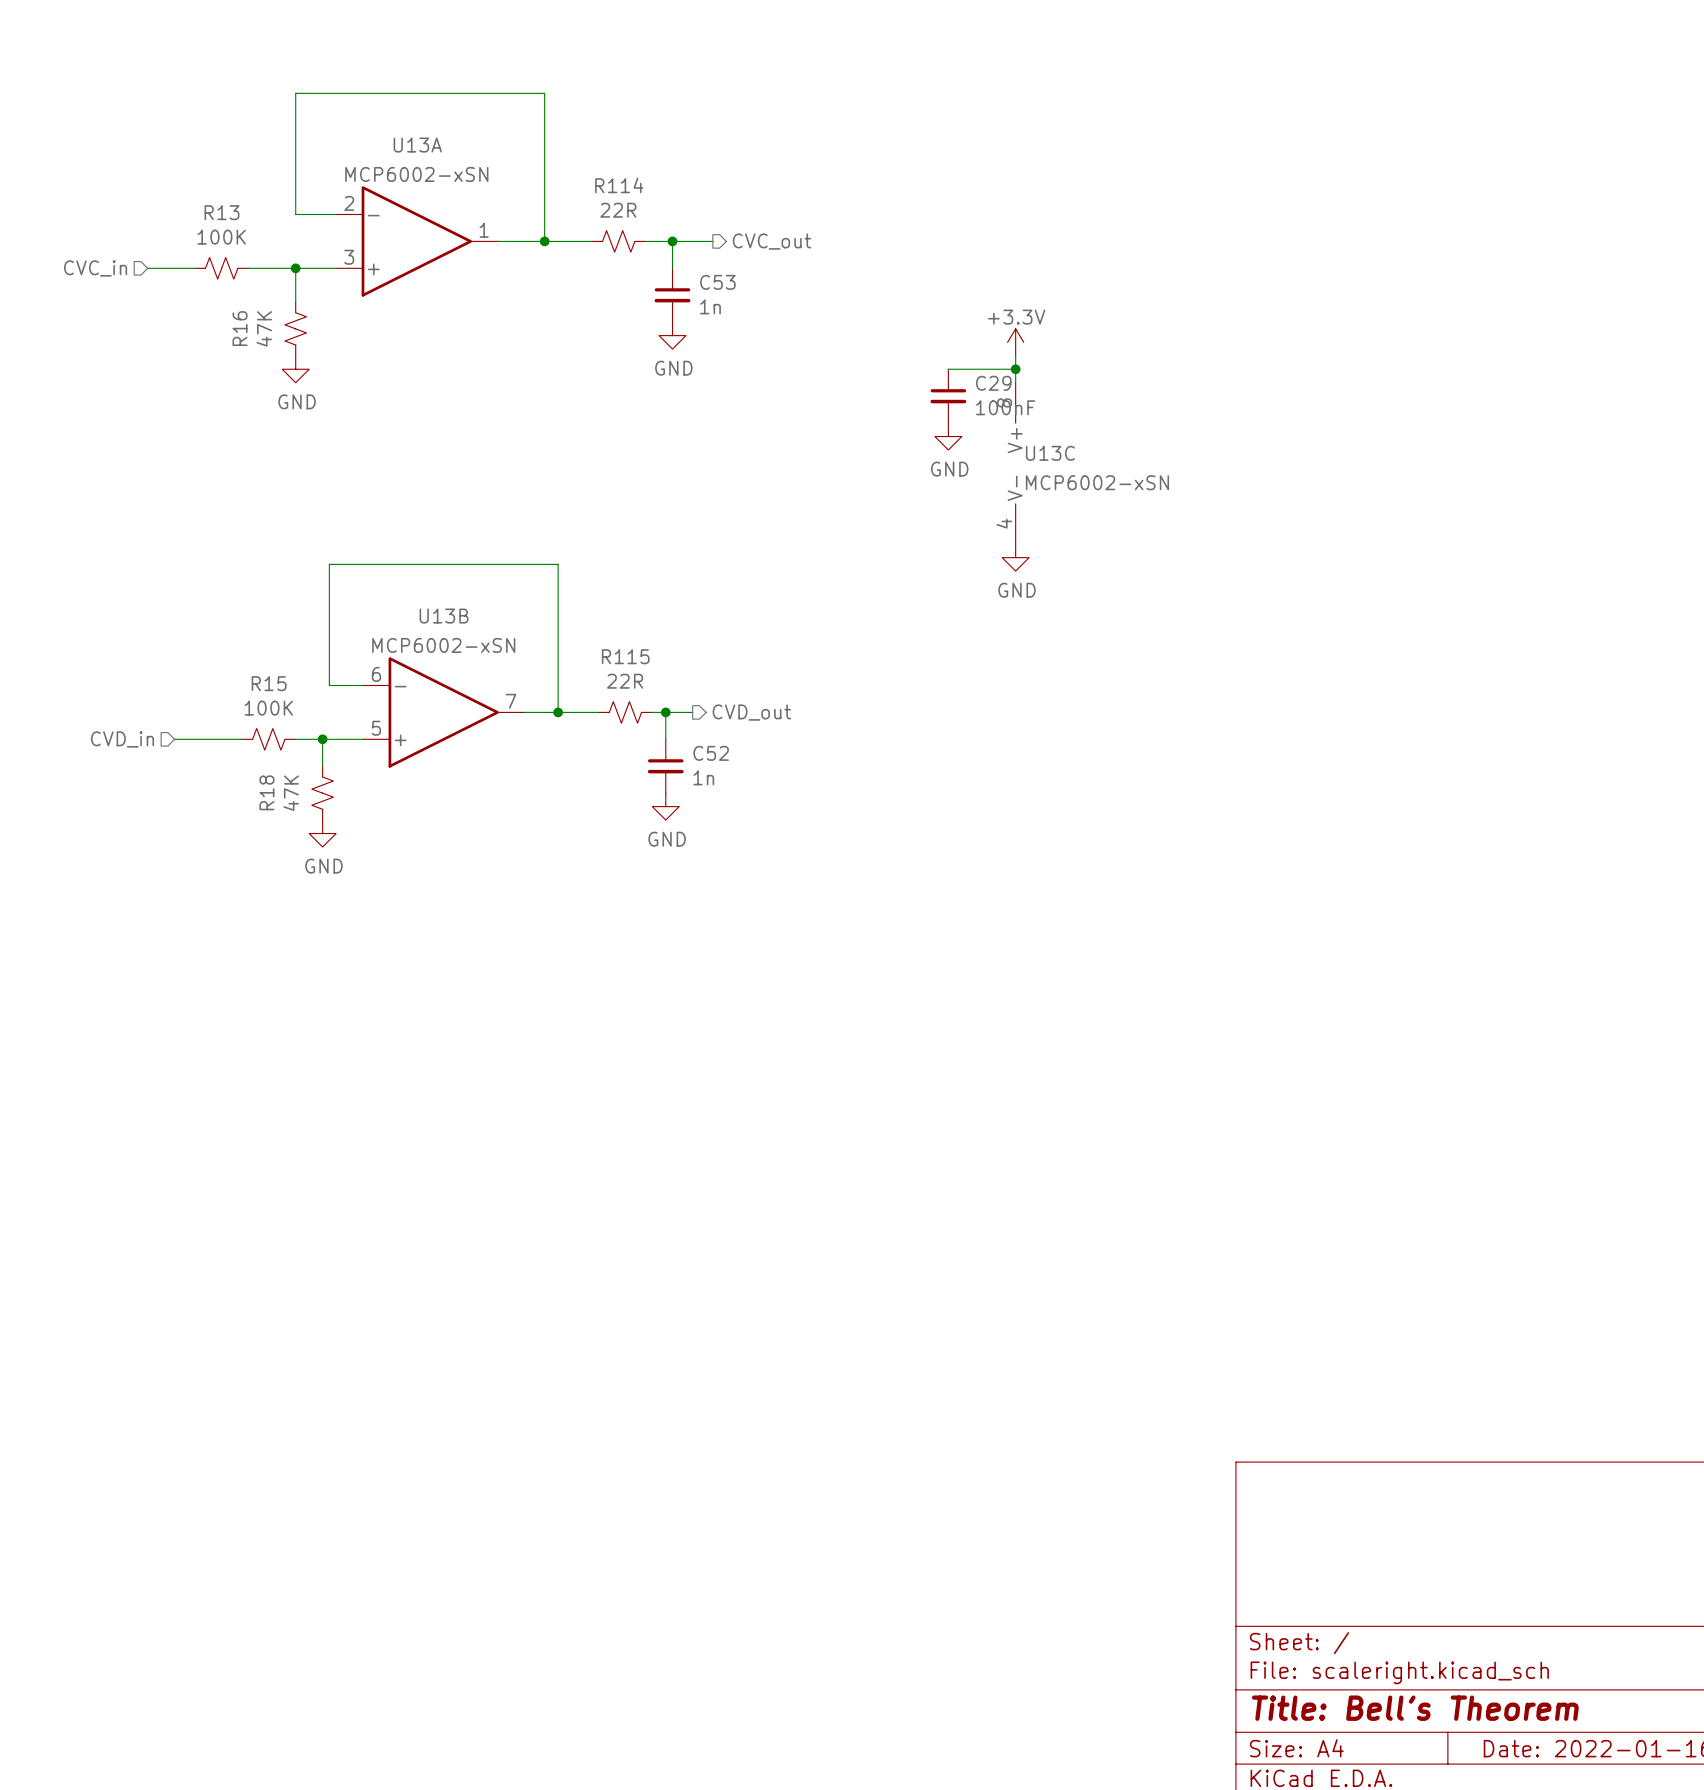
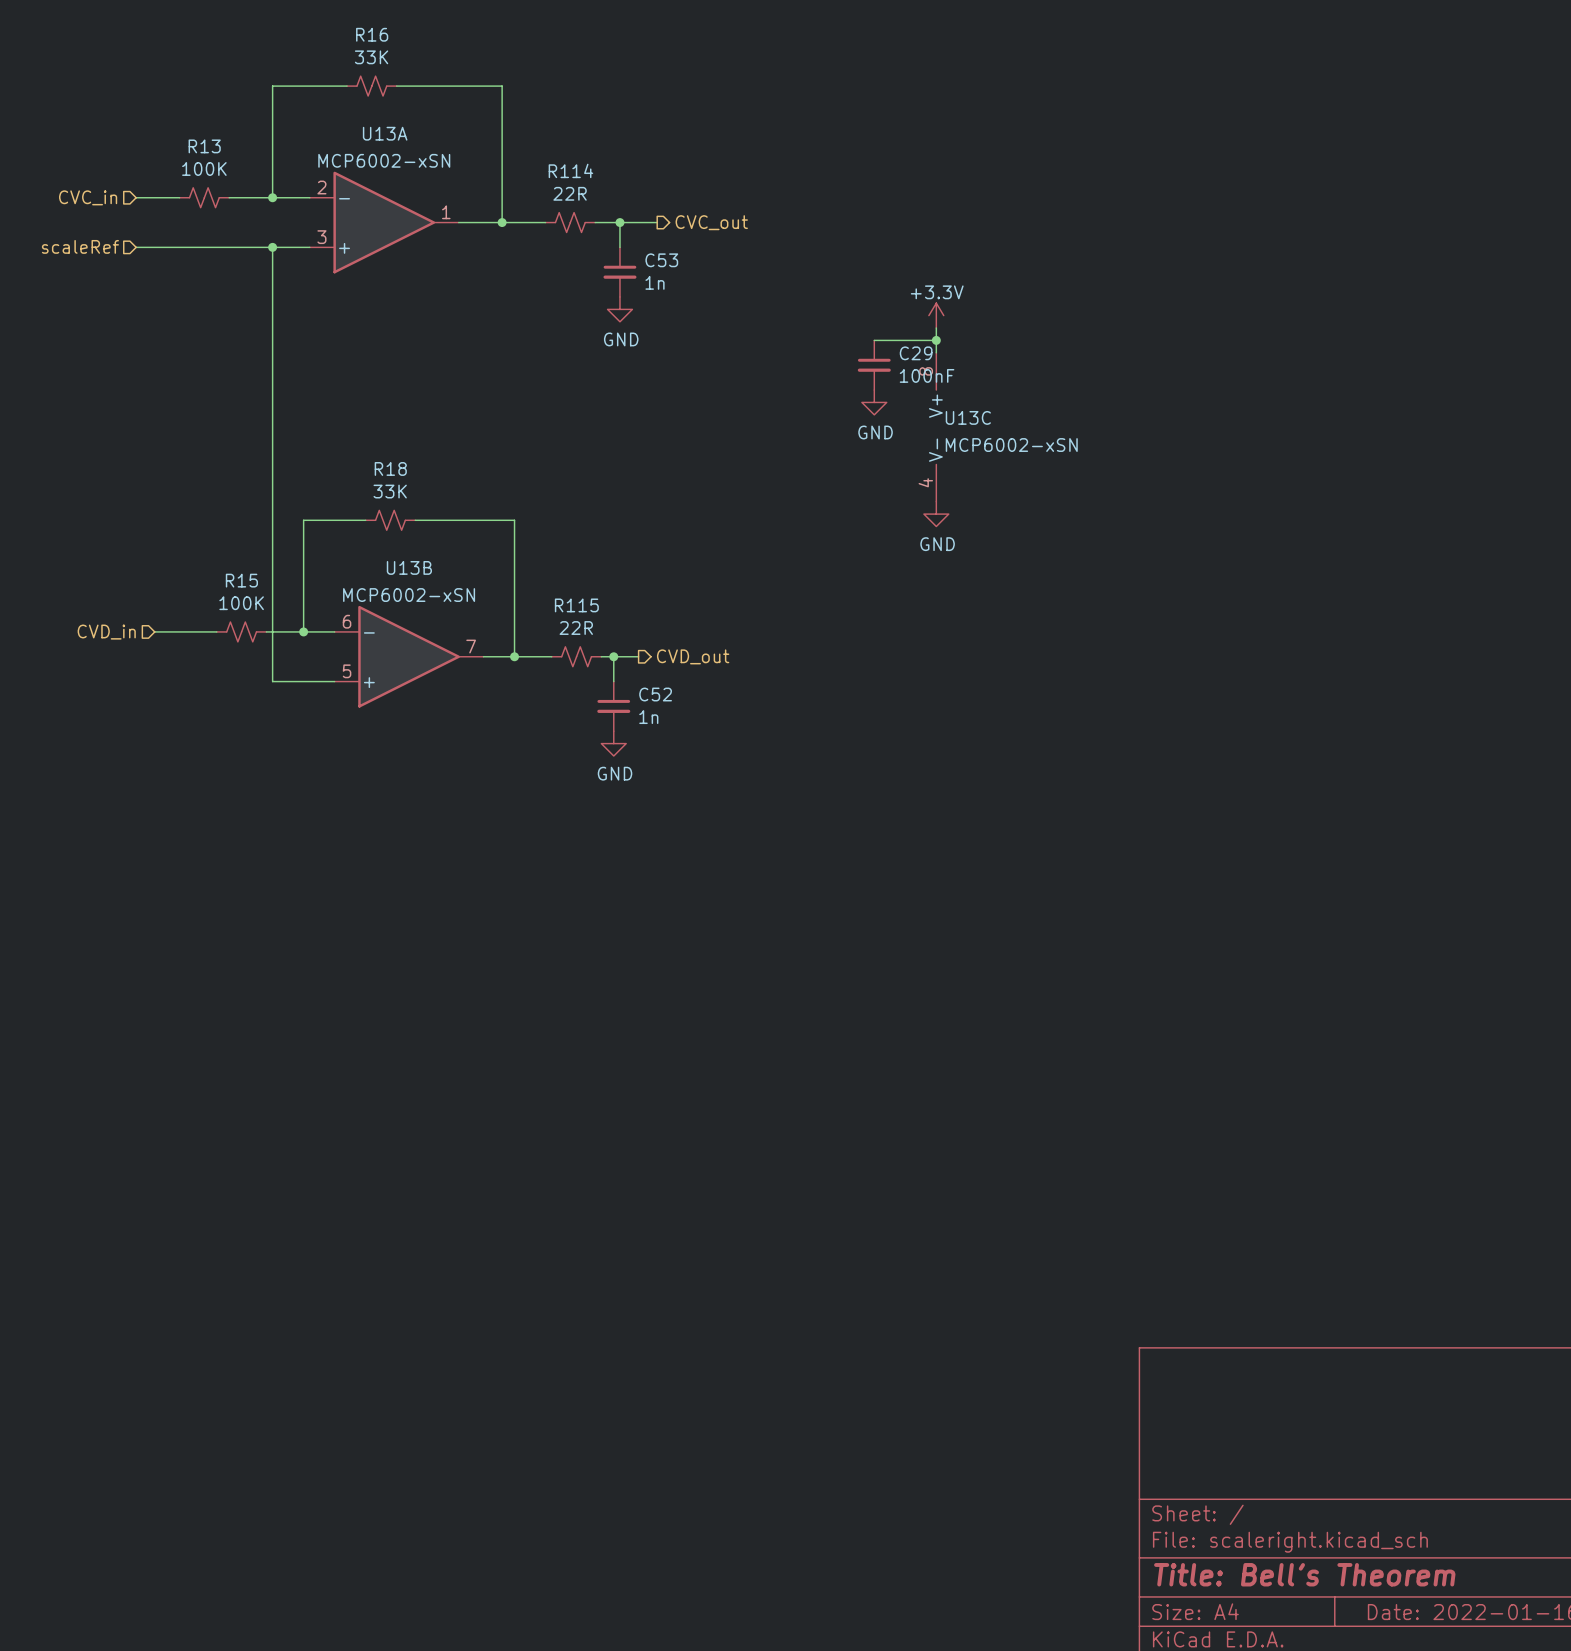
hierarchical label: none -> CVC_in (88, 197)
wire: none -> (136, 197) (179, 197)
wire: none -> (229, 197) (272, 197)
junction: none -> (272, 197)
hierarchical label: CVC_in (95, 268) -> scaleRef (80, 246)
R13 position: (221, 268) -> (204, 197)
wire: none -> (272, 278) (272, 681)
R16 value: 47K (264, 328) -> 33K (371, 57)
R16 rotation: 0° (295, 328) -> 90° clockwise (371, 86)
R16 position: (295, 328) -> (371, 86)
power symbol: GND (295, 369) -> none
wire: (396, 564) (450, 564) -> none
wire: none -> (266, 631) (303, 631)
hierarchical label position: CVD_in (122, 739) -> CVD_in (106, 632)
wire: (174, 739) (241, 739) -> (154, 631) (216, 631)
R15 position: (268, 739) -> (241, 631)
wire: (322, 739) (322, 766) -> none
junction position: (322, 739) -> (303, 631)
R18 value: 47K (291, 793) -> 33K (390, 491)
R18 rotation: 0° (322, 793) -> 90° clockwise (390, 520)
R18 position: (322, 793) -> (390, 520)
power symbol: GND (322, 833) -> none

